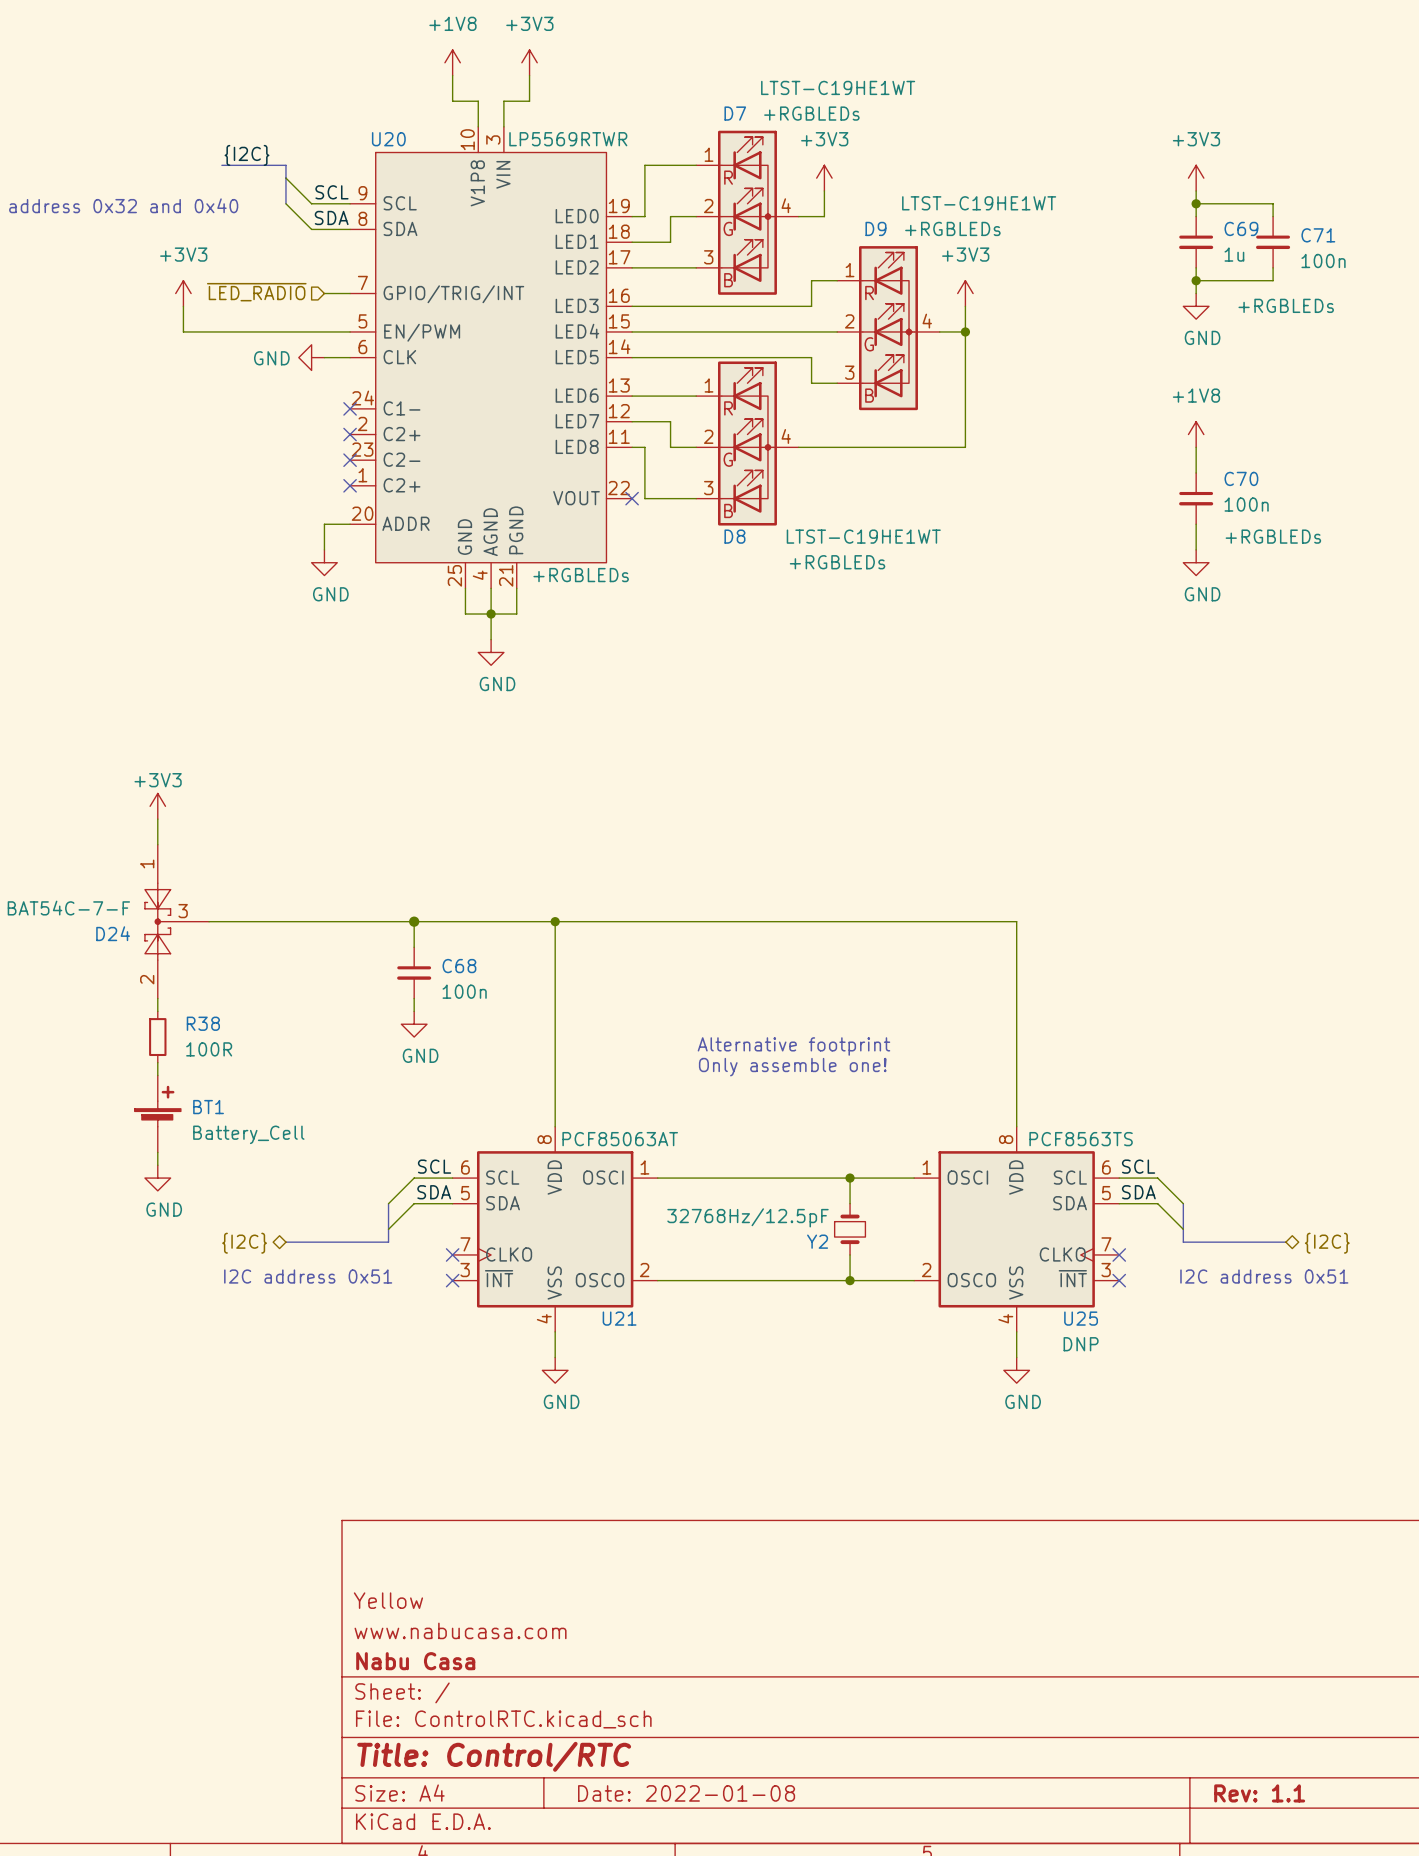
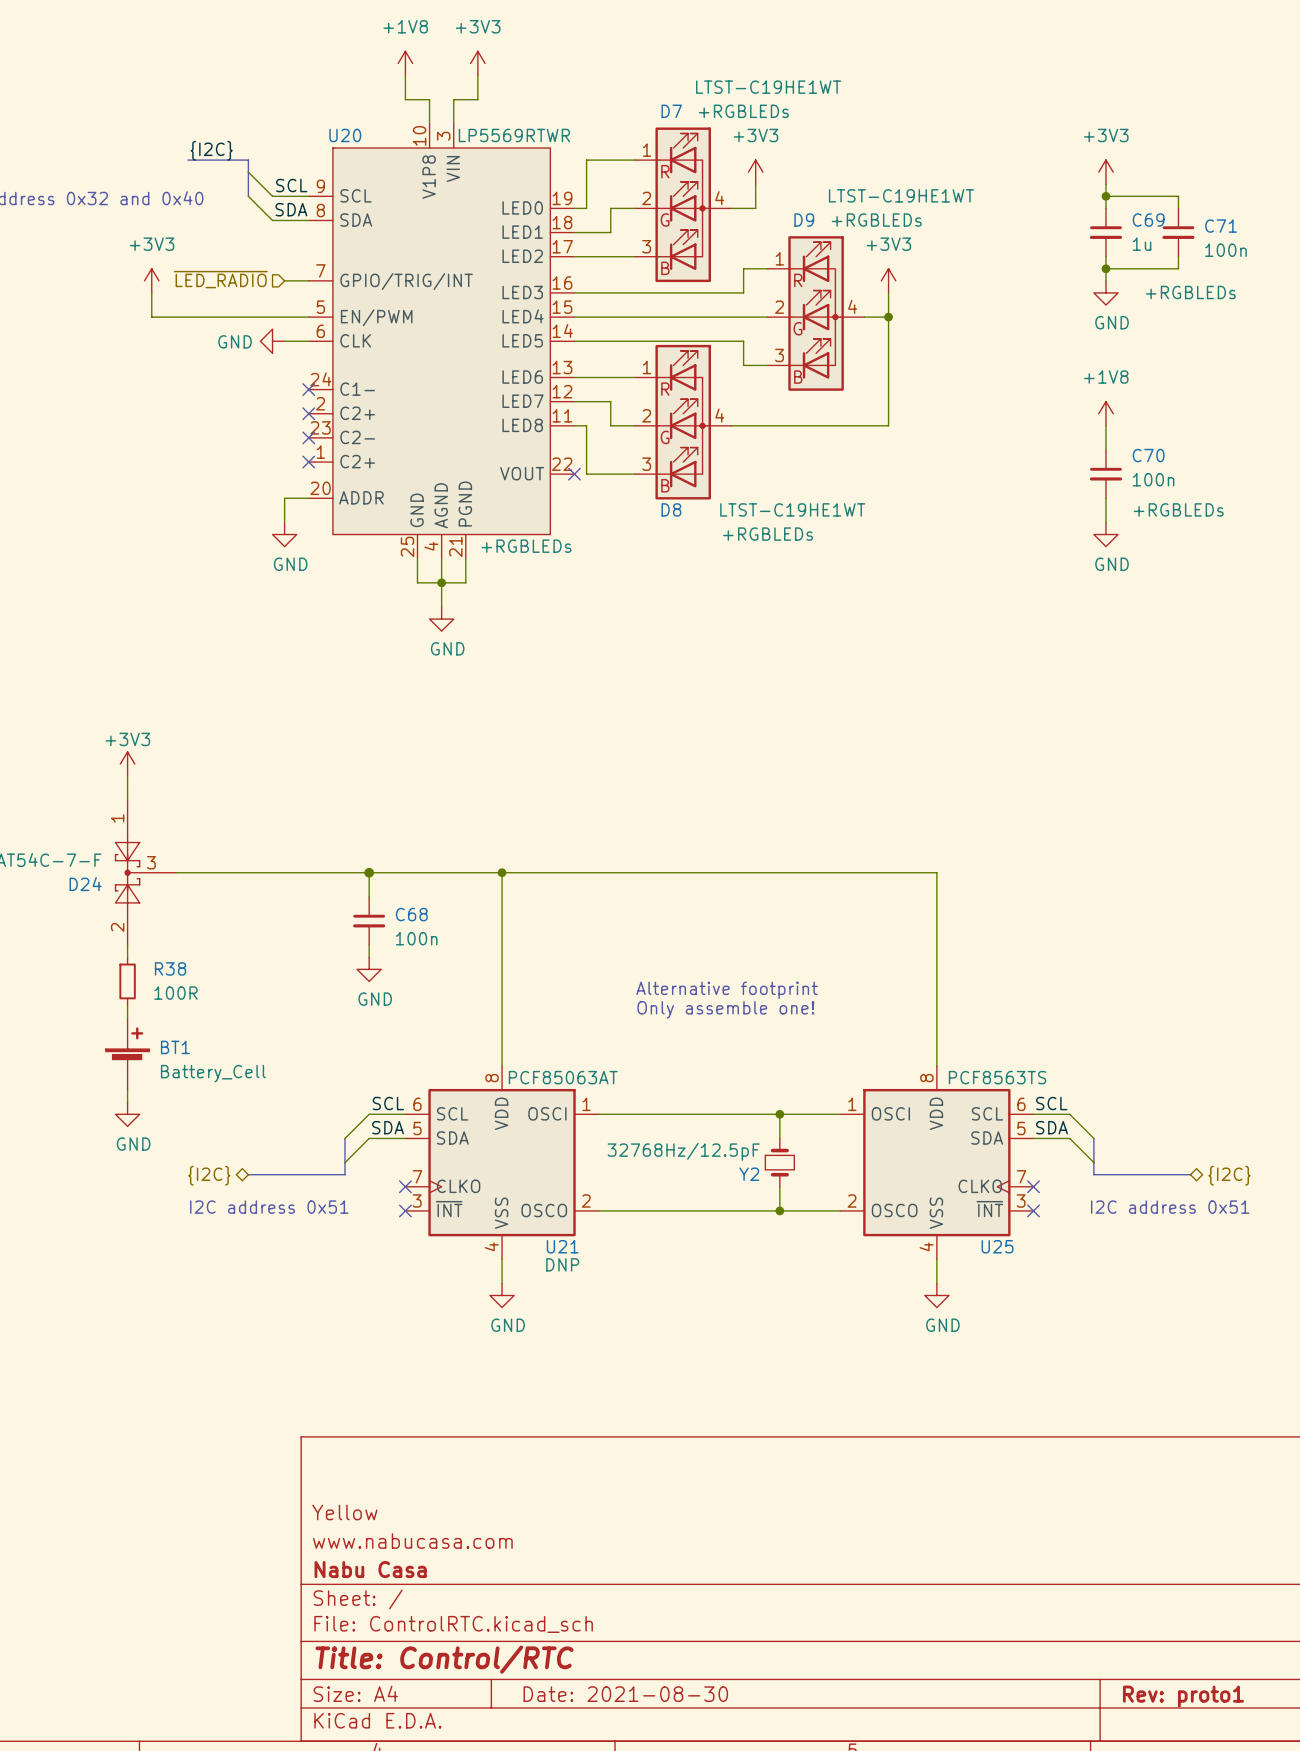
U21 text: none -> DNP (562, 1264)
U25 text: DNP (1081, 1344) -> none
title block: Date: 2022-01-08 (686, 1793) -> Date: 2021-08-30 (625, 1694)
title block: Rev: 1.1 (1259, 1793) -> Rev: proto1 (1183, 1696)

